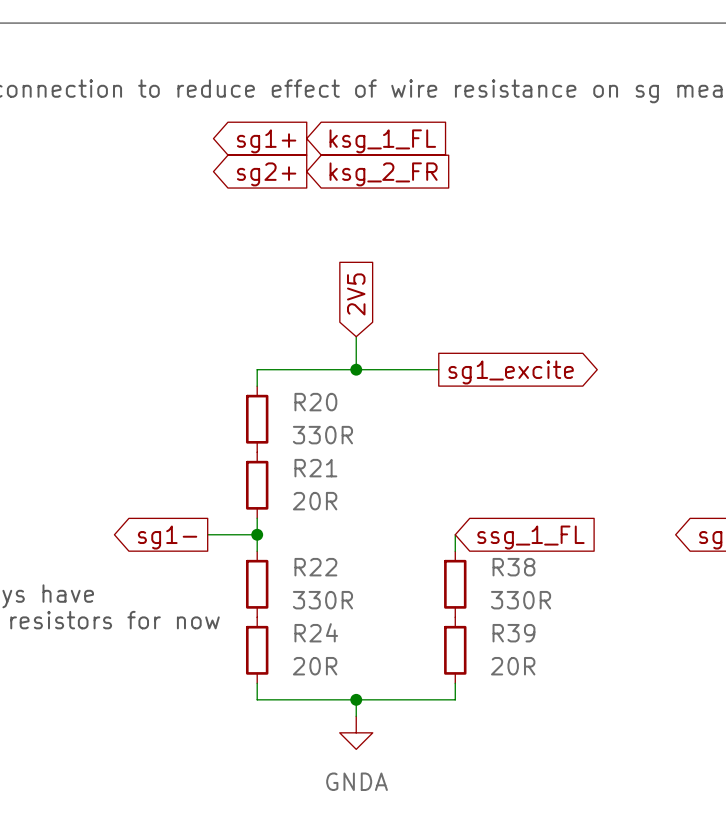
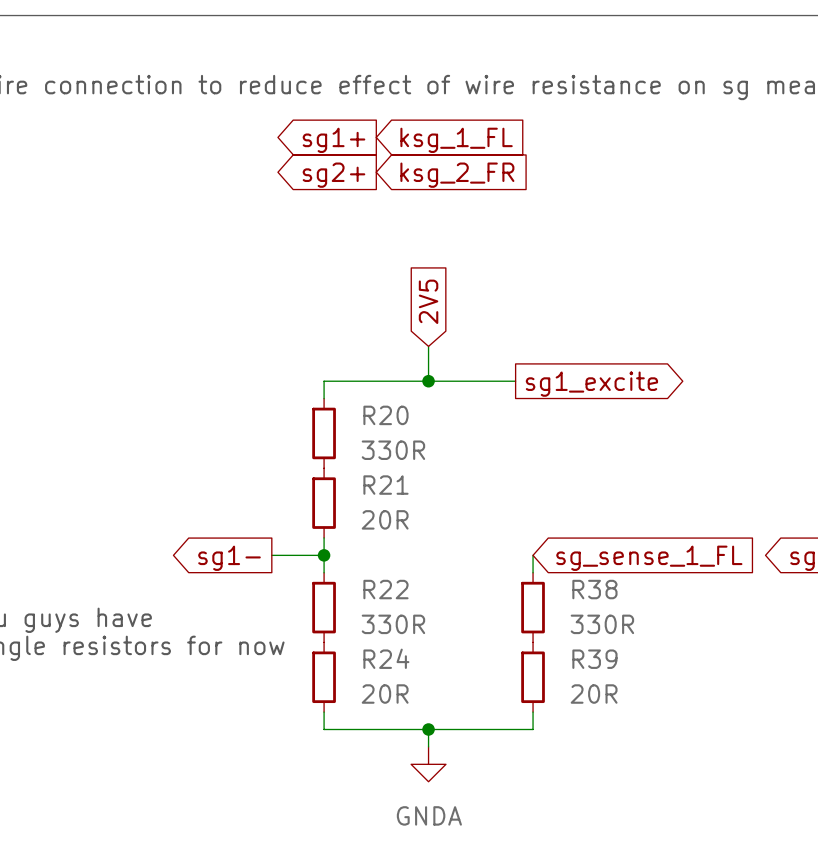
global label: ssg_1_FL (530, 537) -> sg_sense_1_FL (649, 558)

